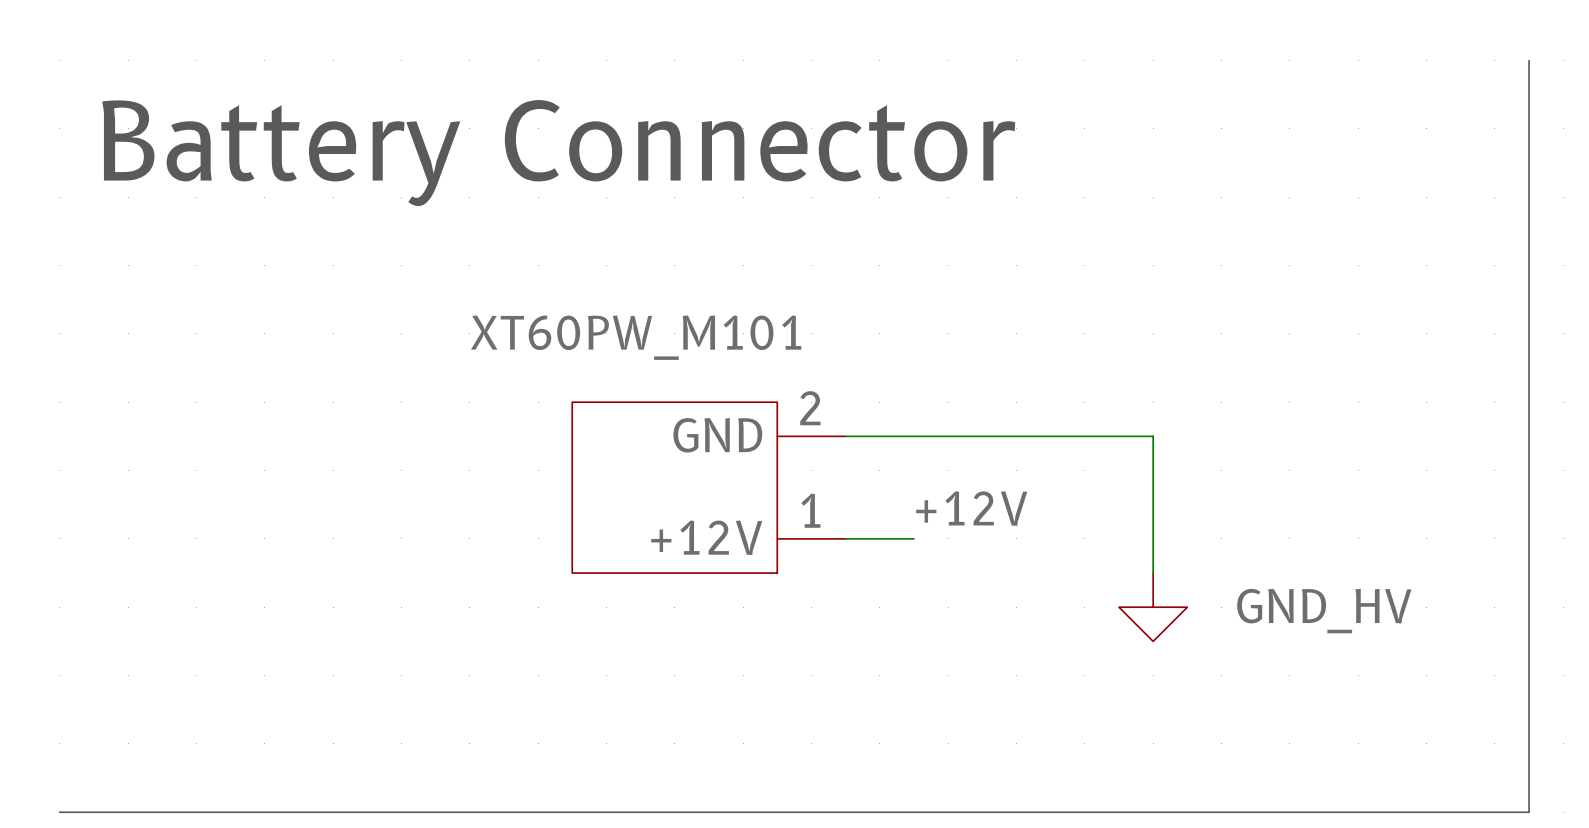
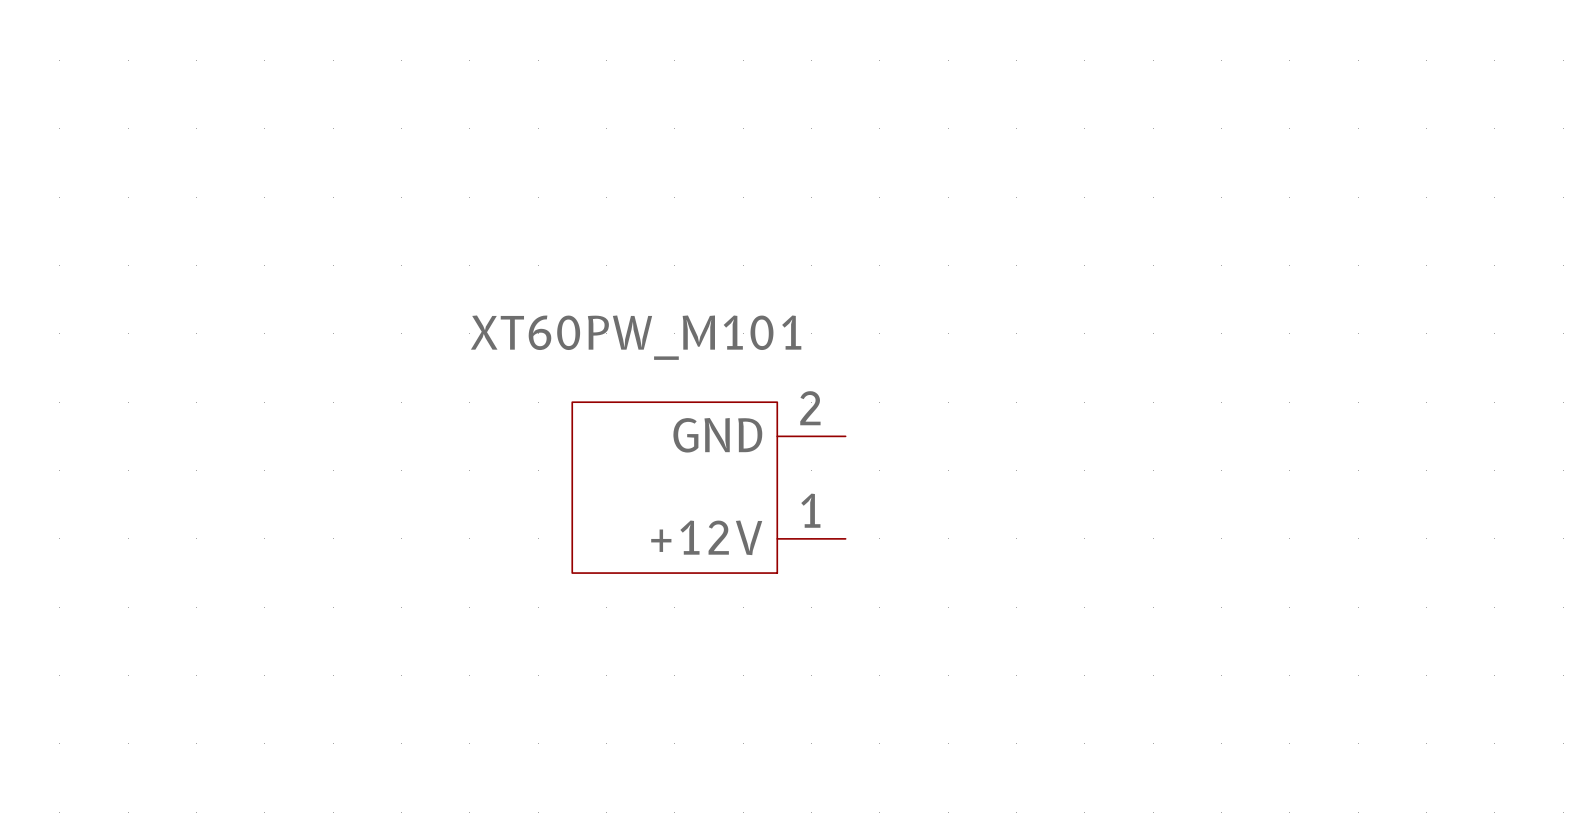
line: (1529, 60) (1529, 812) (59, 812) -> none
text: Battery Connector (558, 153) -> none
wire: (845, 436) (1153, 436) (1153, 573) -> none
label: +12V (971, 508) -> none
wire: (845, 538) (913, 538) -> none
power symbol: GND_HV (1153, 607) -> none

